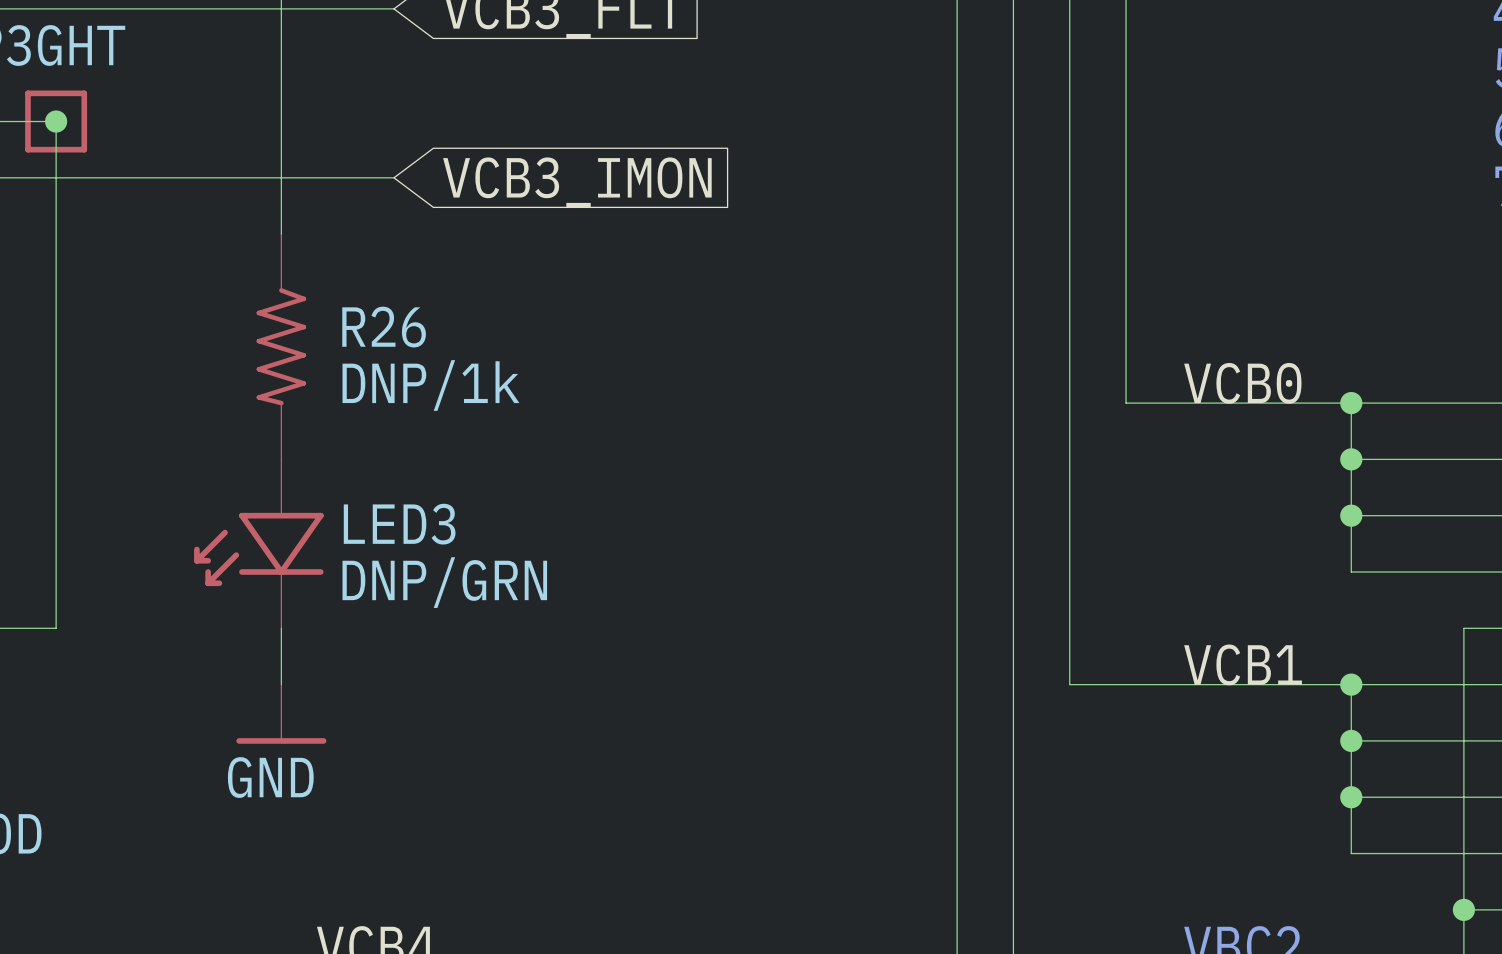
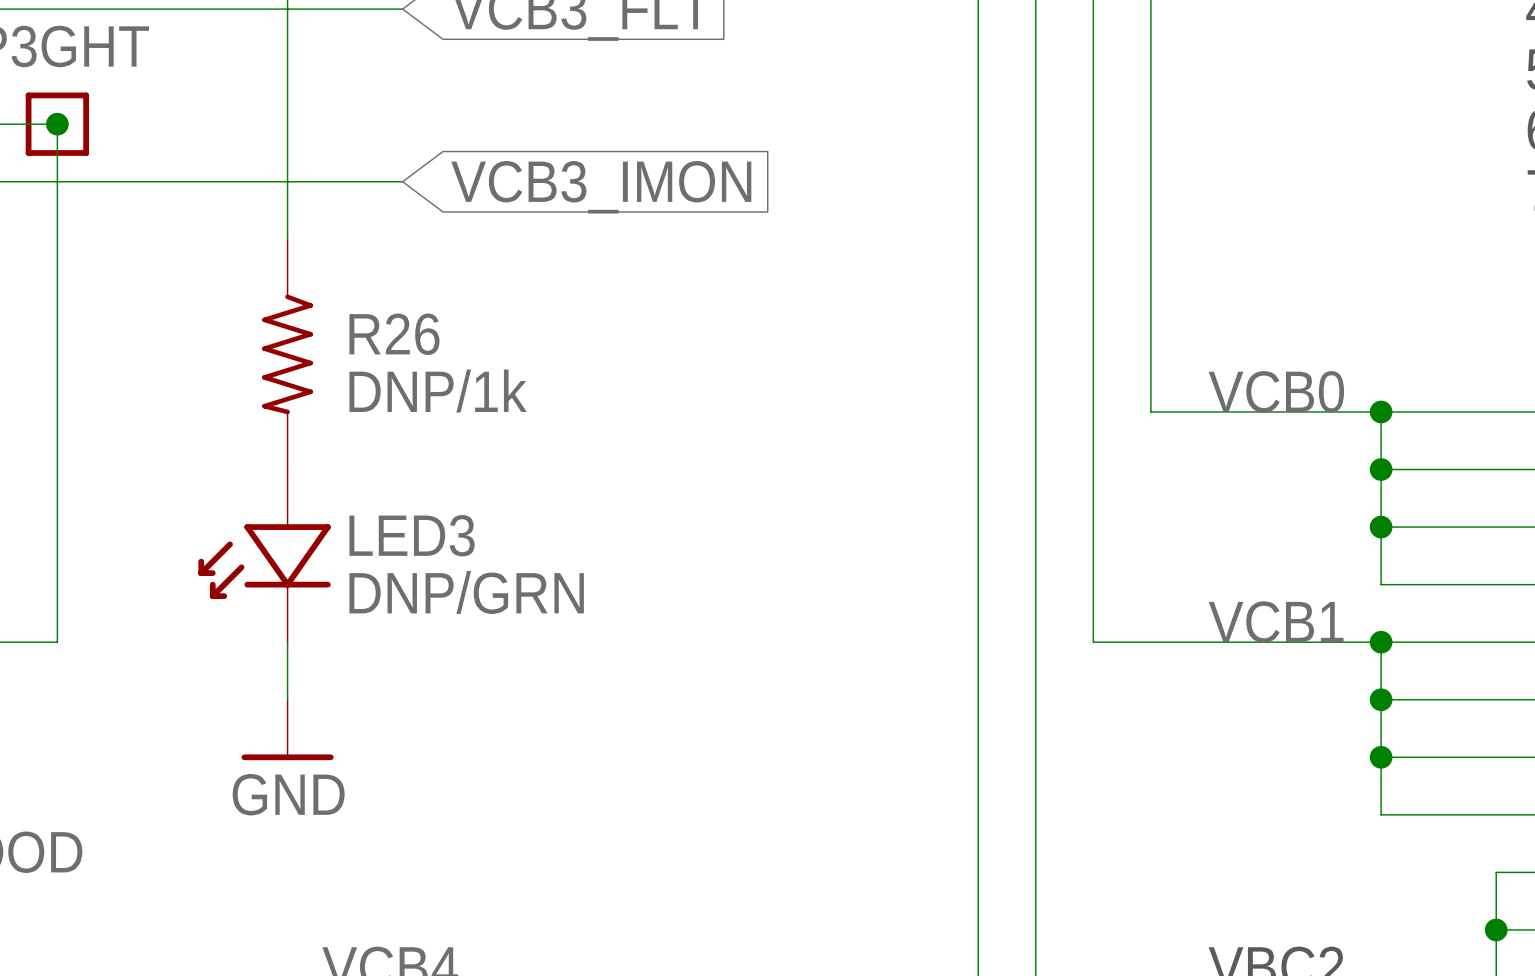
wire: (1069, 628) (1069, 684) (1351, 684) -> (1093, 642) (1496, 642)
wire: none -> (1381, 642) (1381, 699)
junction: none -> (1381, 642)
wire: (1463, 628) (1463, 853) (1351, 853) (1351, 797) -> none
label position: VCB1 (1243, 664) -> VCB1 (1276, 622)
junction: (1351, 797) -> none

